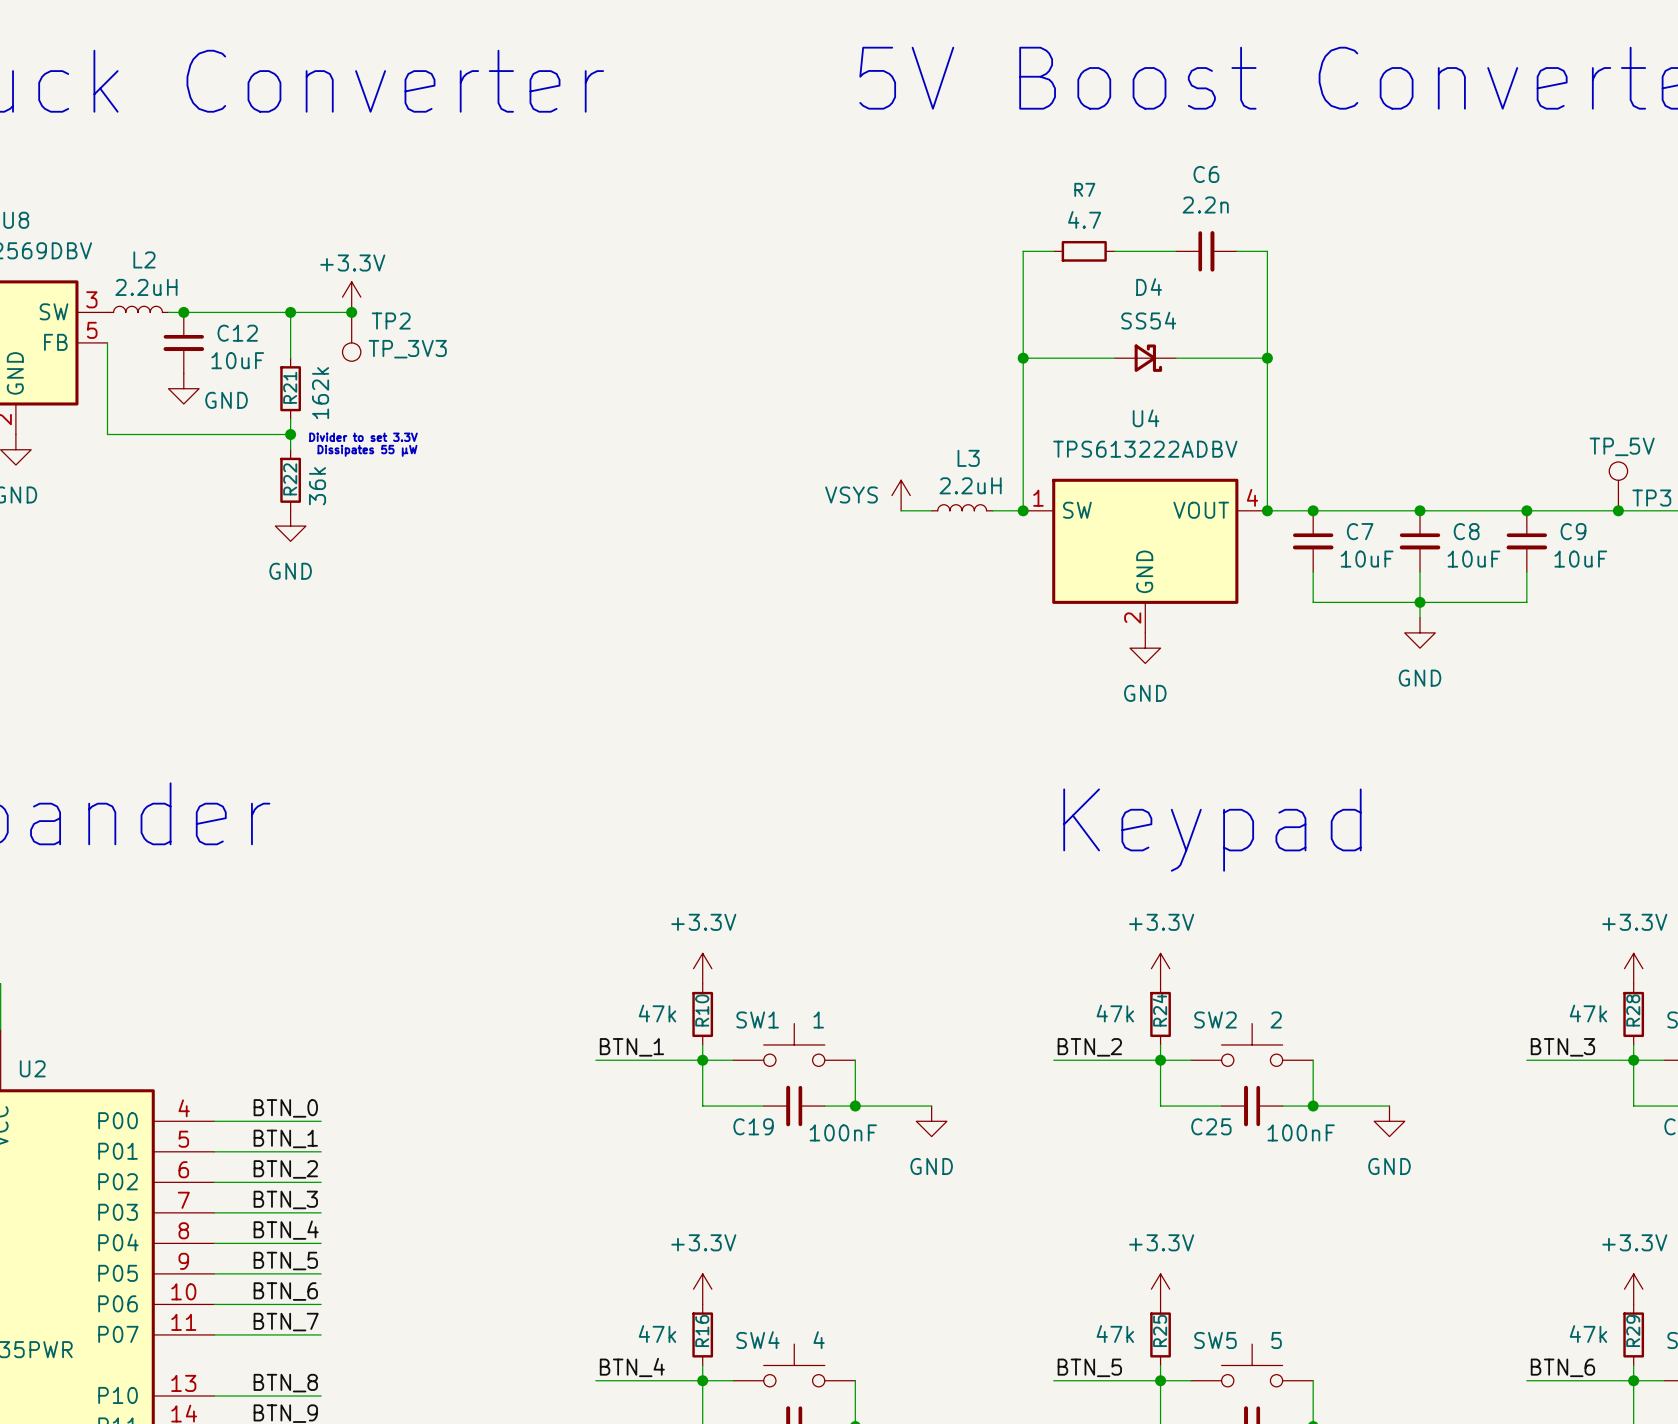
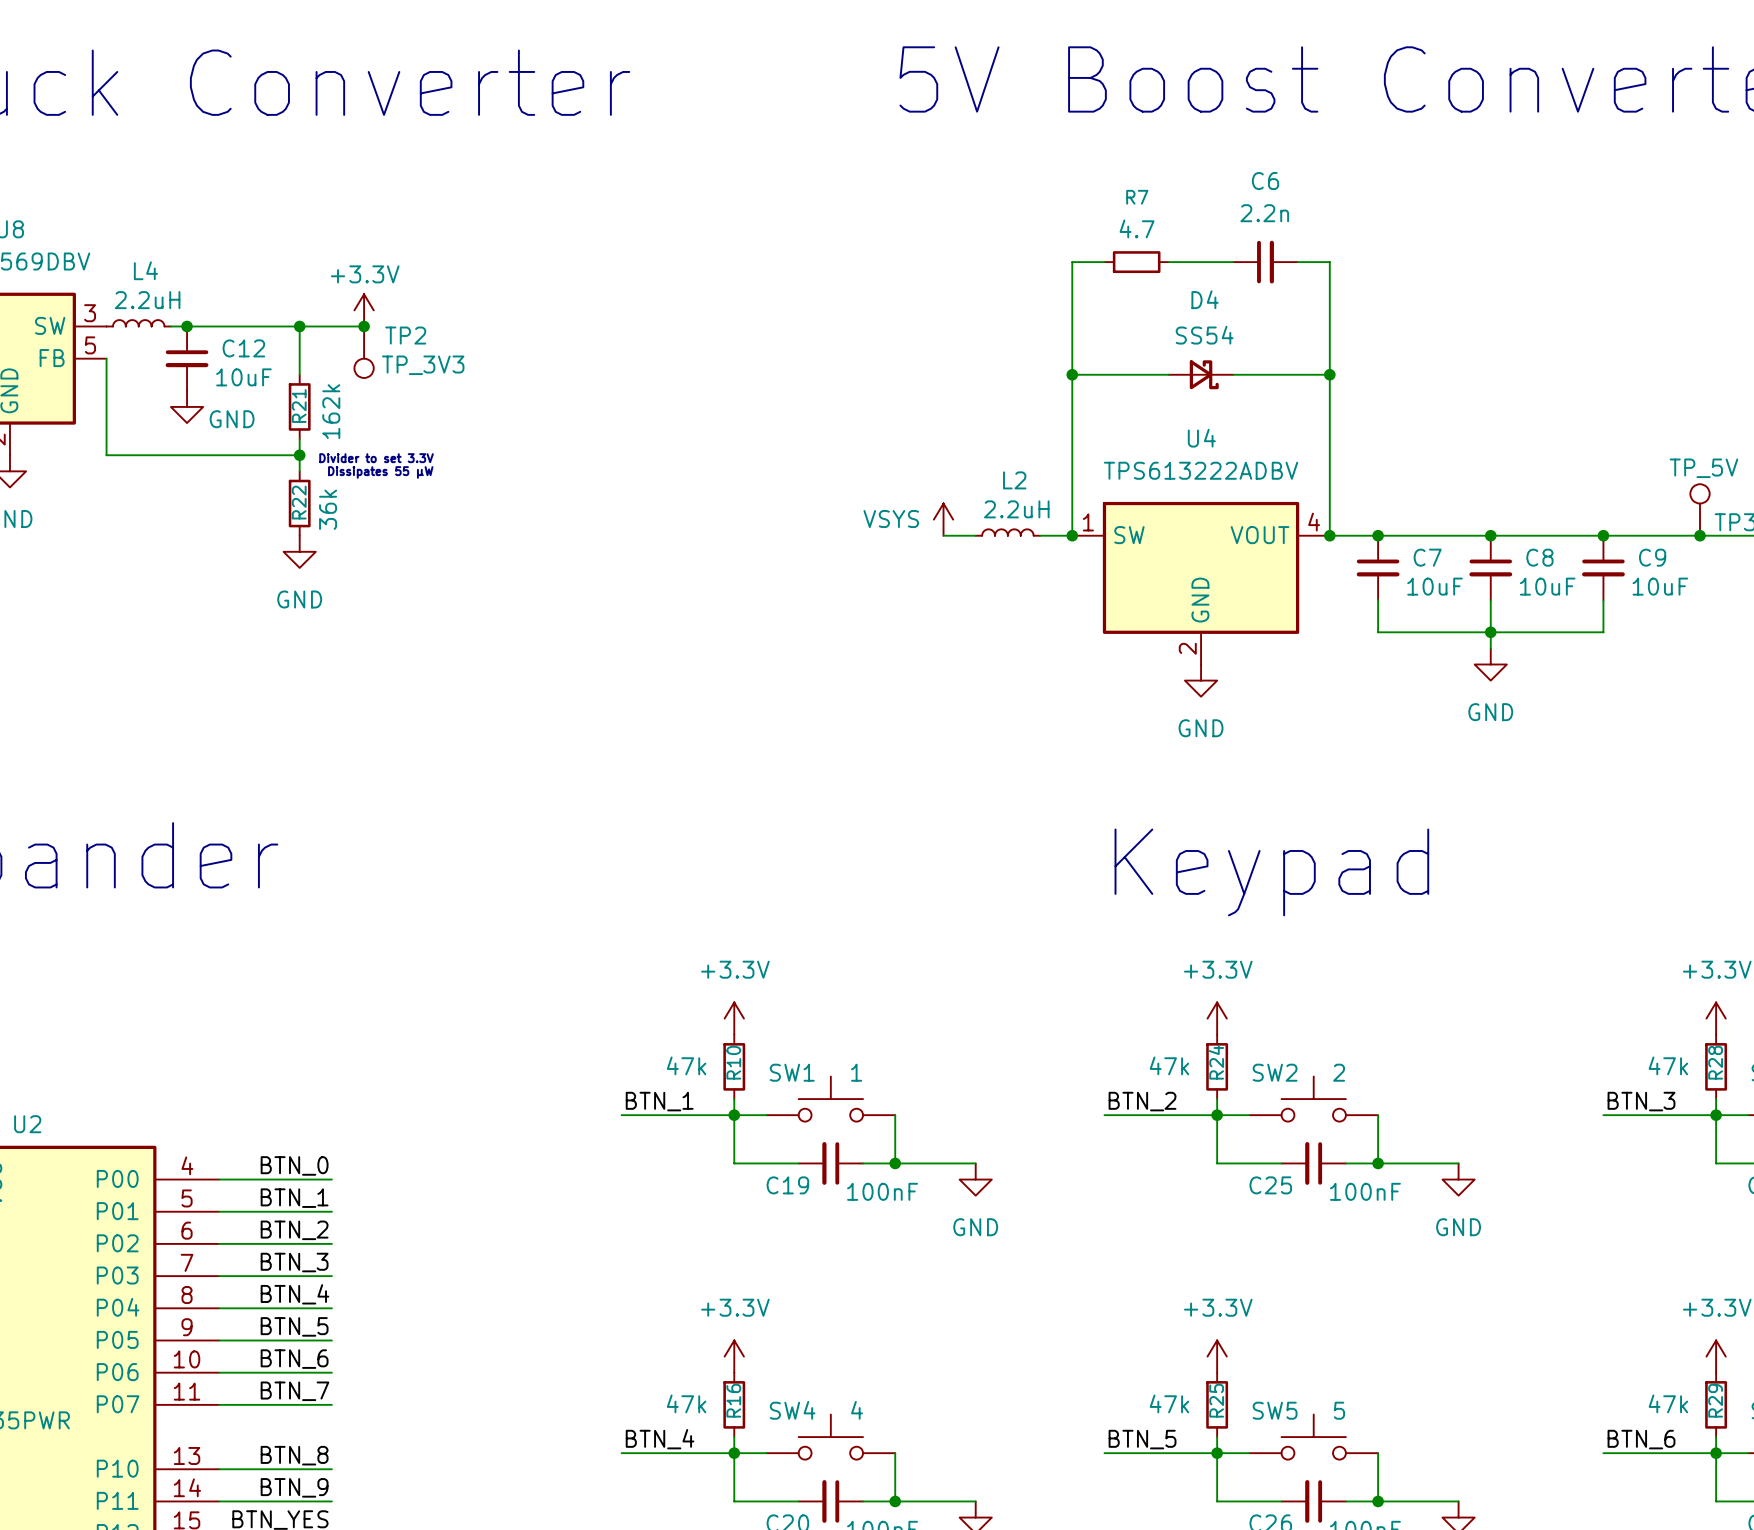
L2 name: L2 (144, 259) -> L4 (145, 270)
L3 name: L3 (968, 458) -> L2 (1014, 480)

